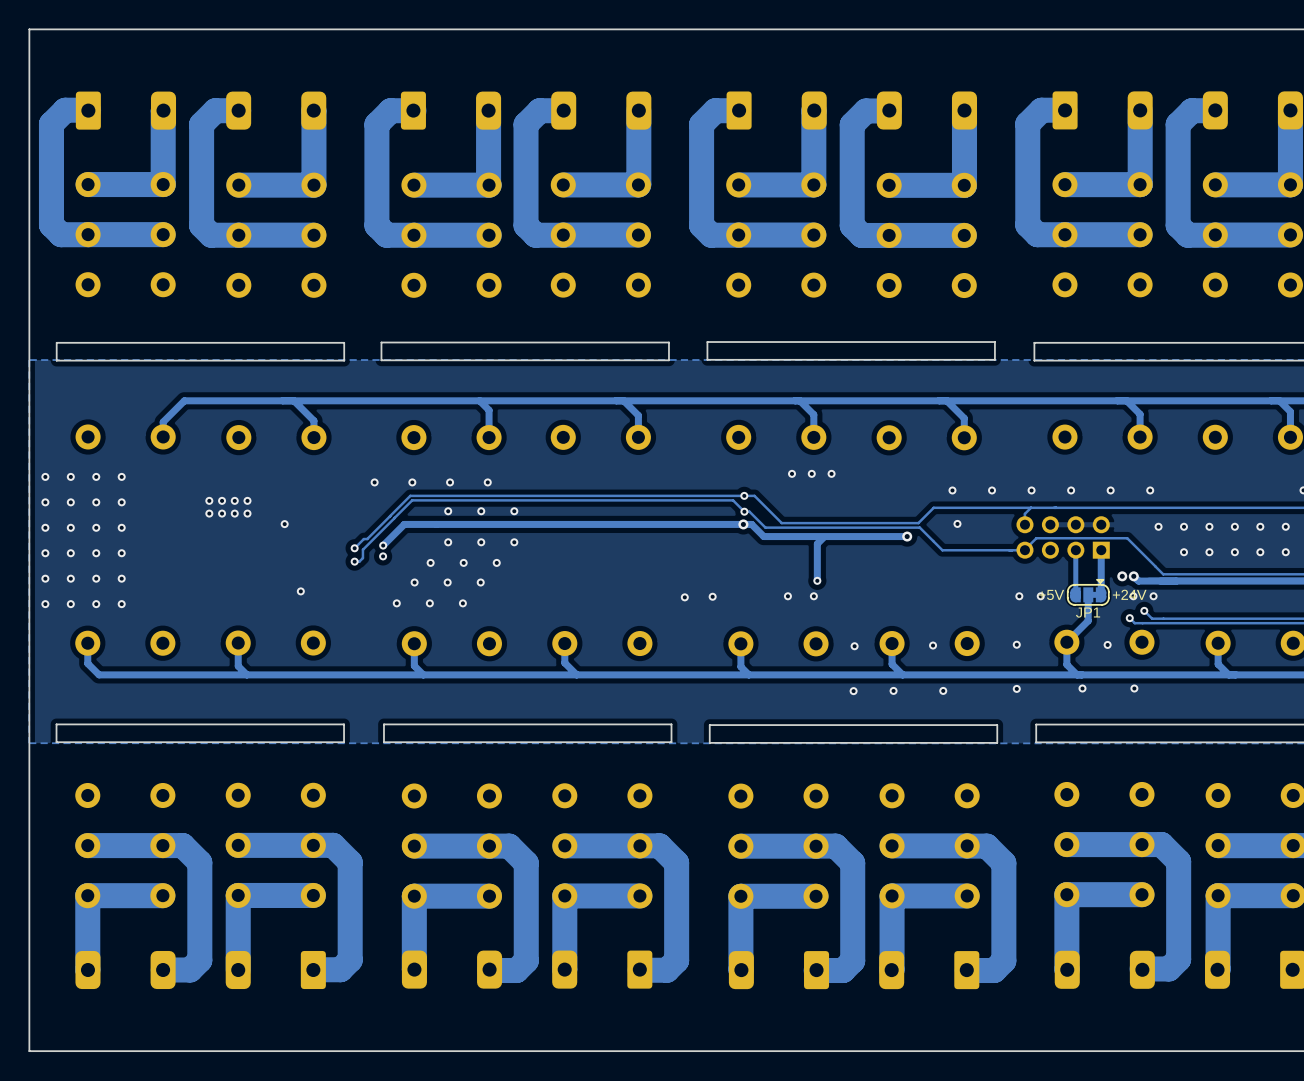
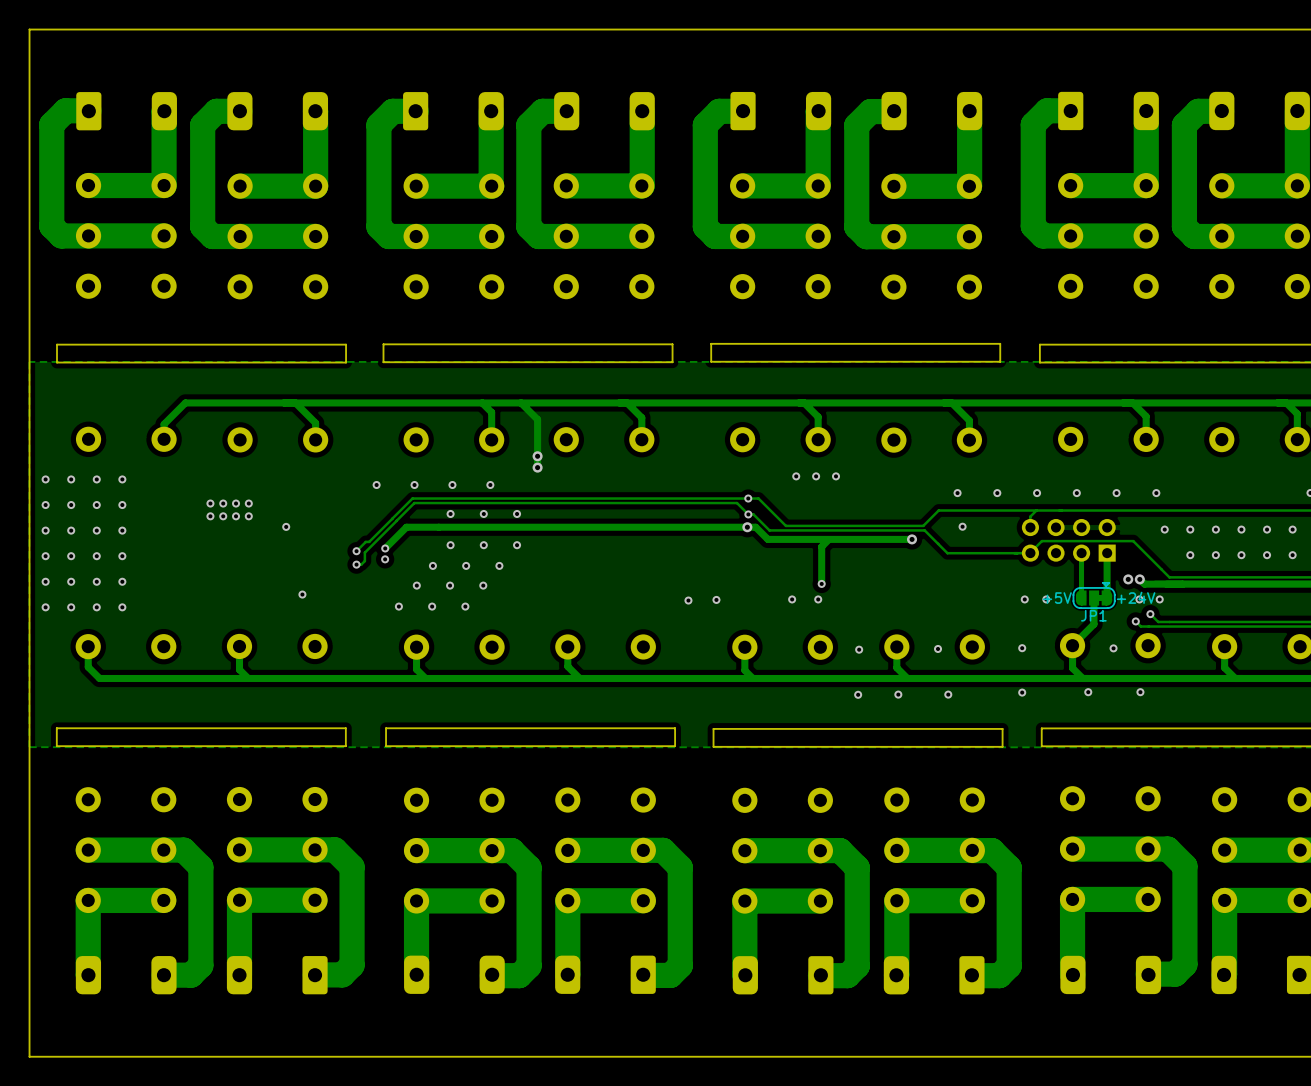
track: none -> (521, 402) (537, 419) (537, 467)
via: none -> (537, 456)
via: none -> (537, 467)

